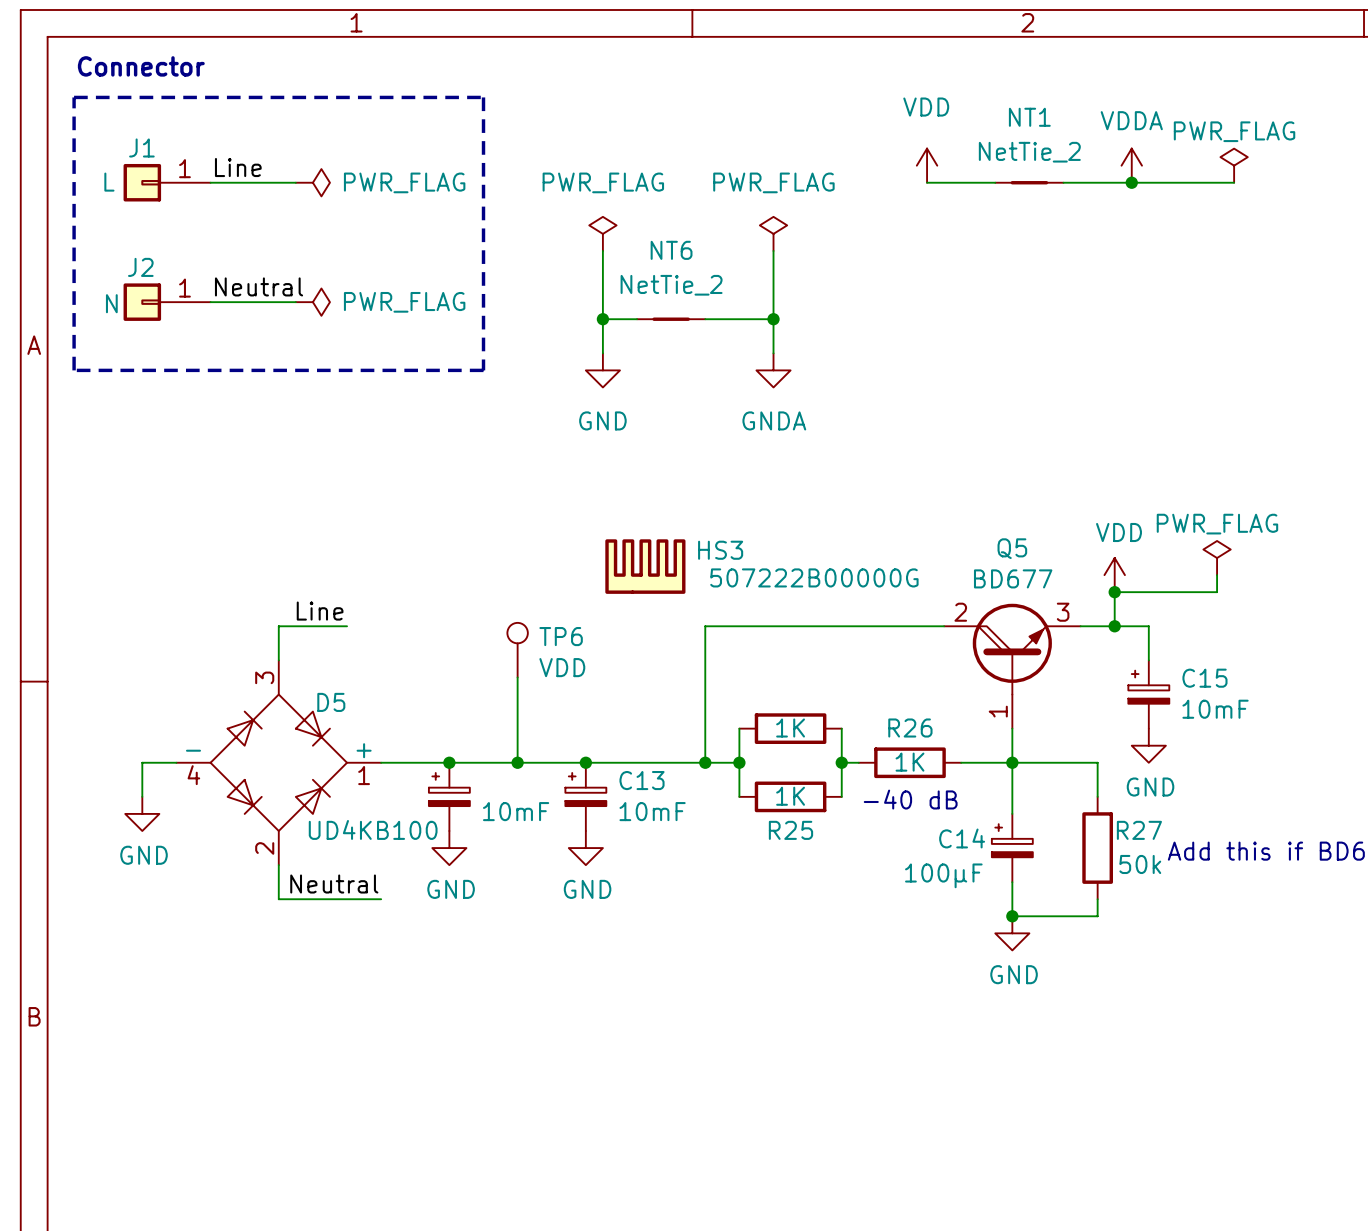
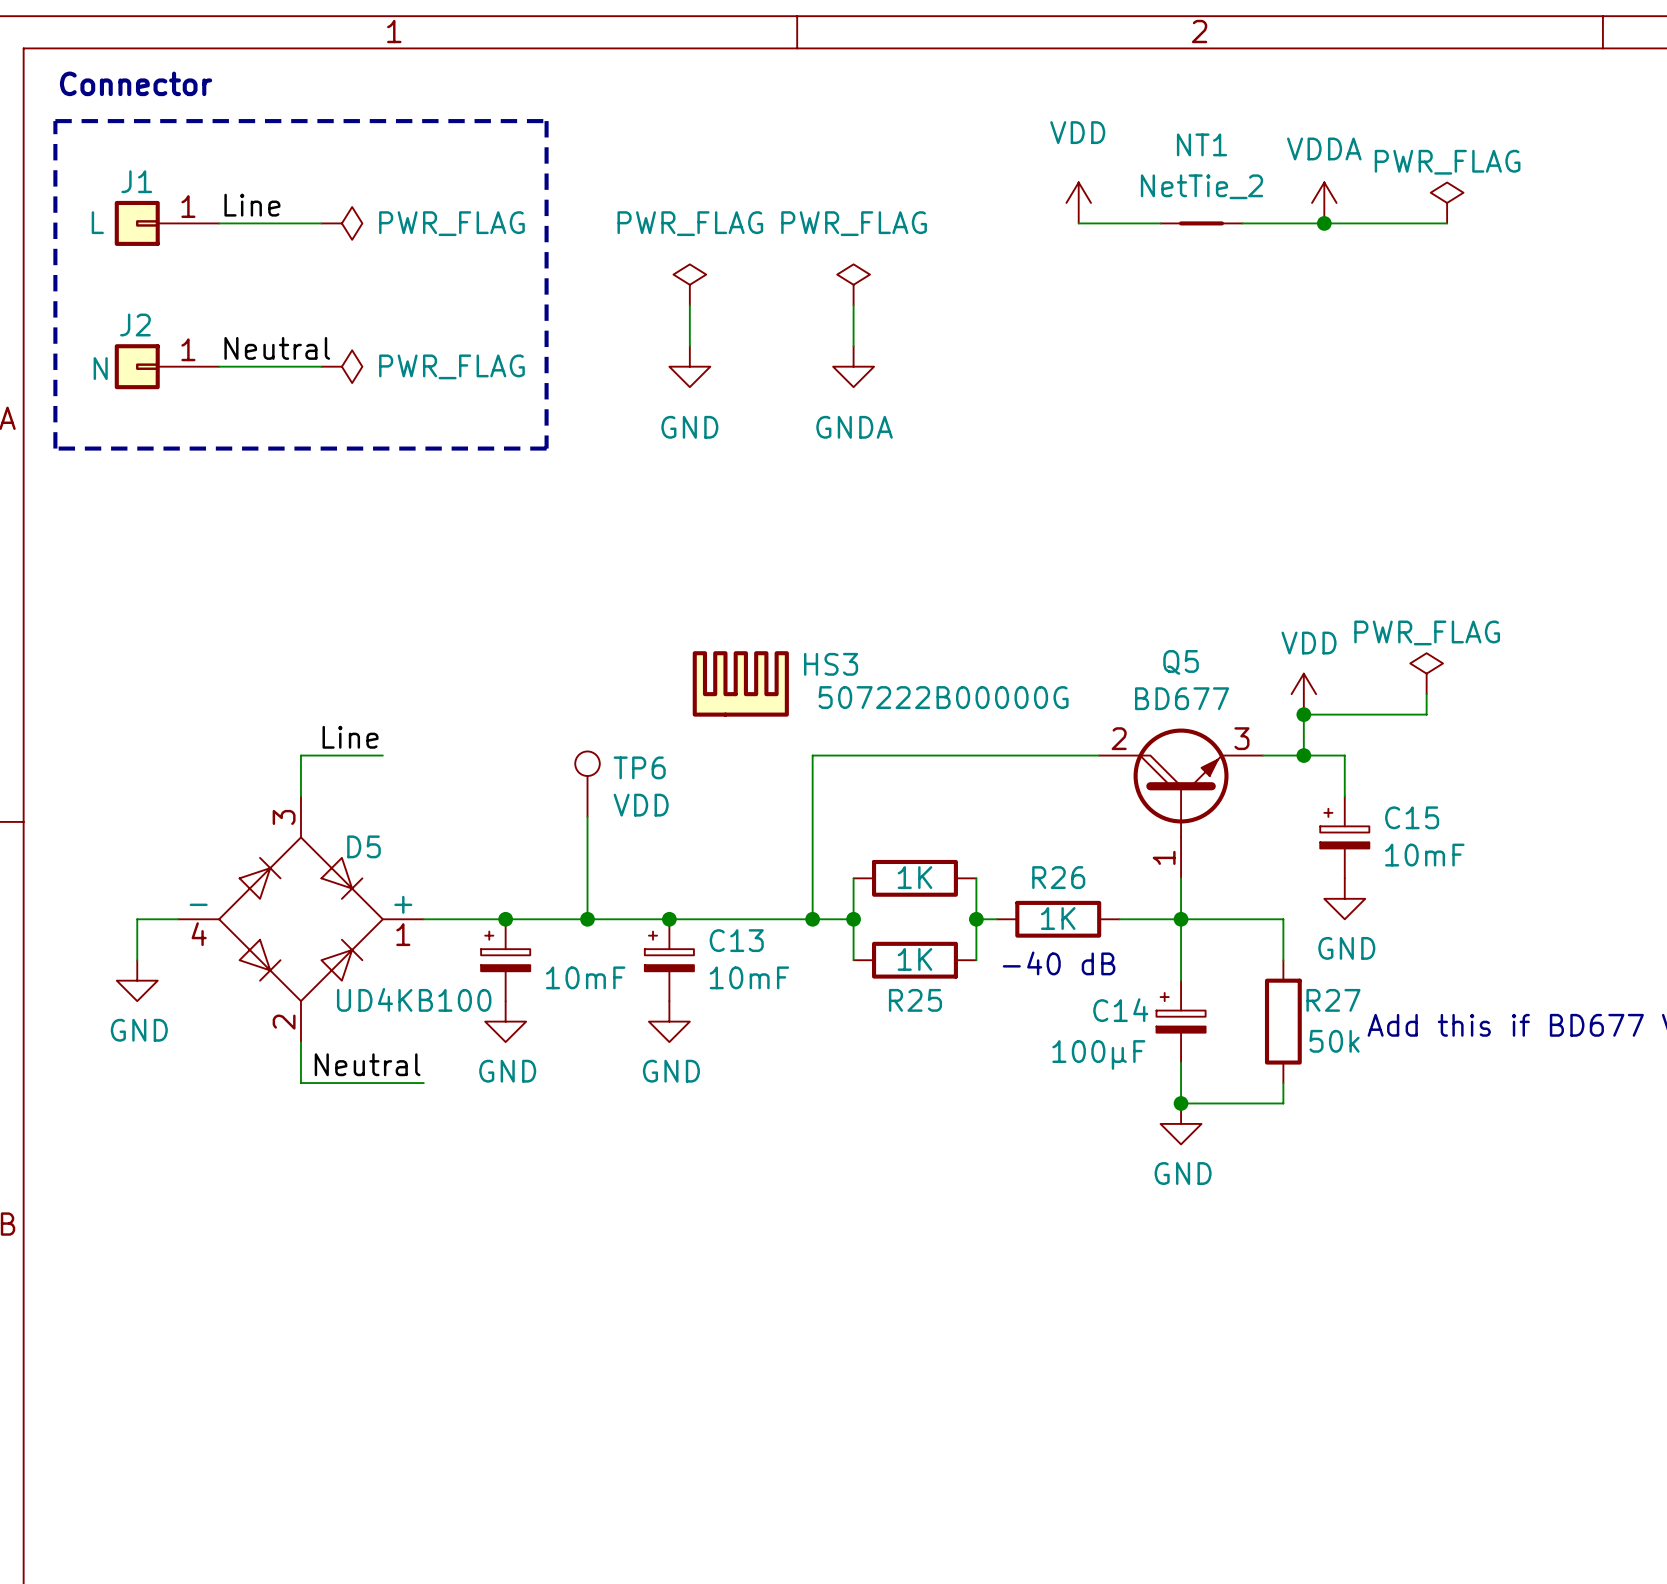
power symbol position: PWR_FLAG (773, 233) -> PWR_FLAG (853, 284)
wire: none -> (853, 305) (853, 346)
wire: (773, 250) (773, 353) -> none
wire: (602, 285) (602, 353) -> none
wire: (602, 319) (637, 319) -> none
junction: (602, 319) -> none
NT6: NetTie_2 (671, 319) -> none
wire: (705, 319) (773, 319) -> none
junction: (773, 319) -> none
power symbol position: GND (602, 370) -> GND (689, 366)
power symbol position: GNDA (773, 370) -> GNDA (853, 366)

